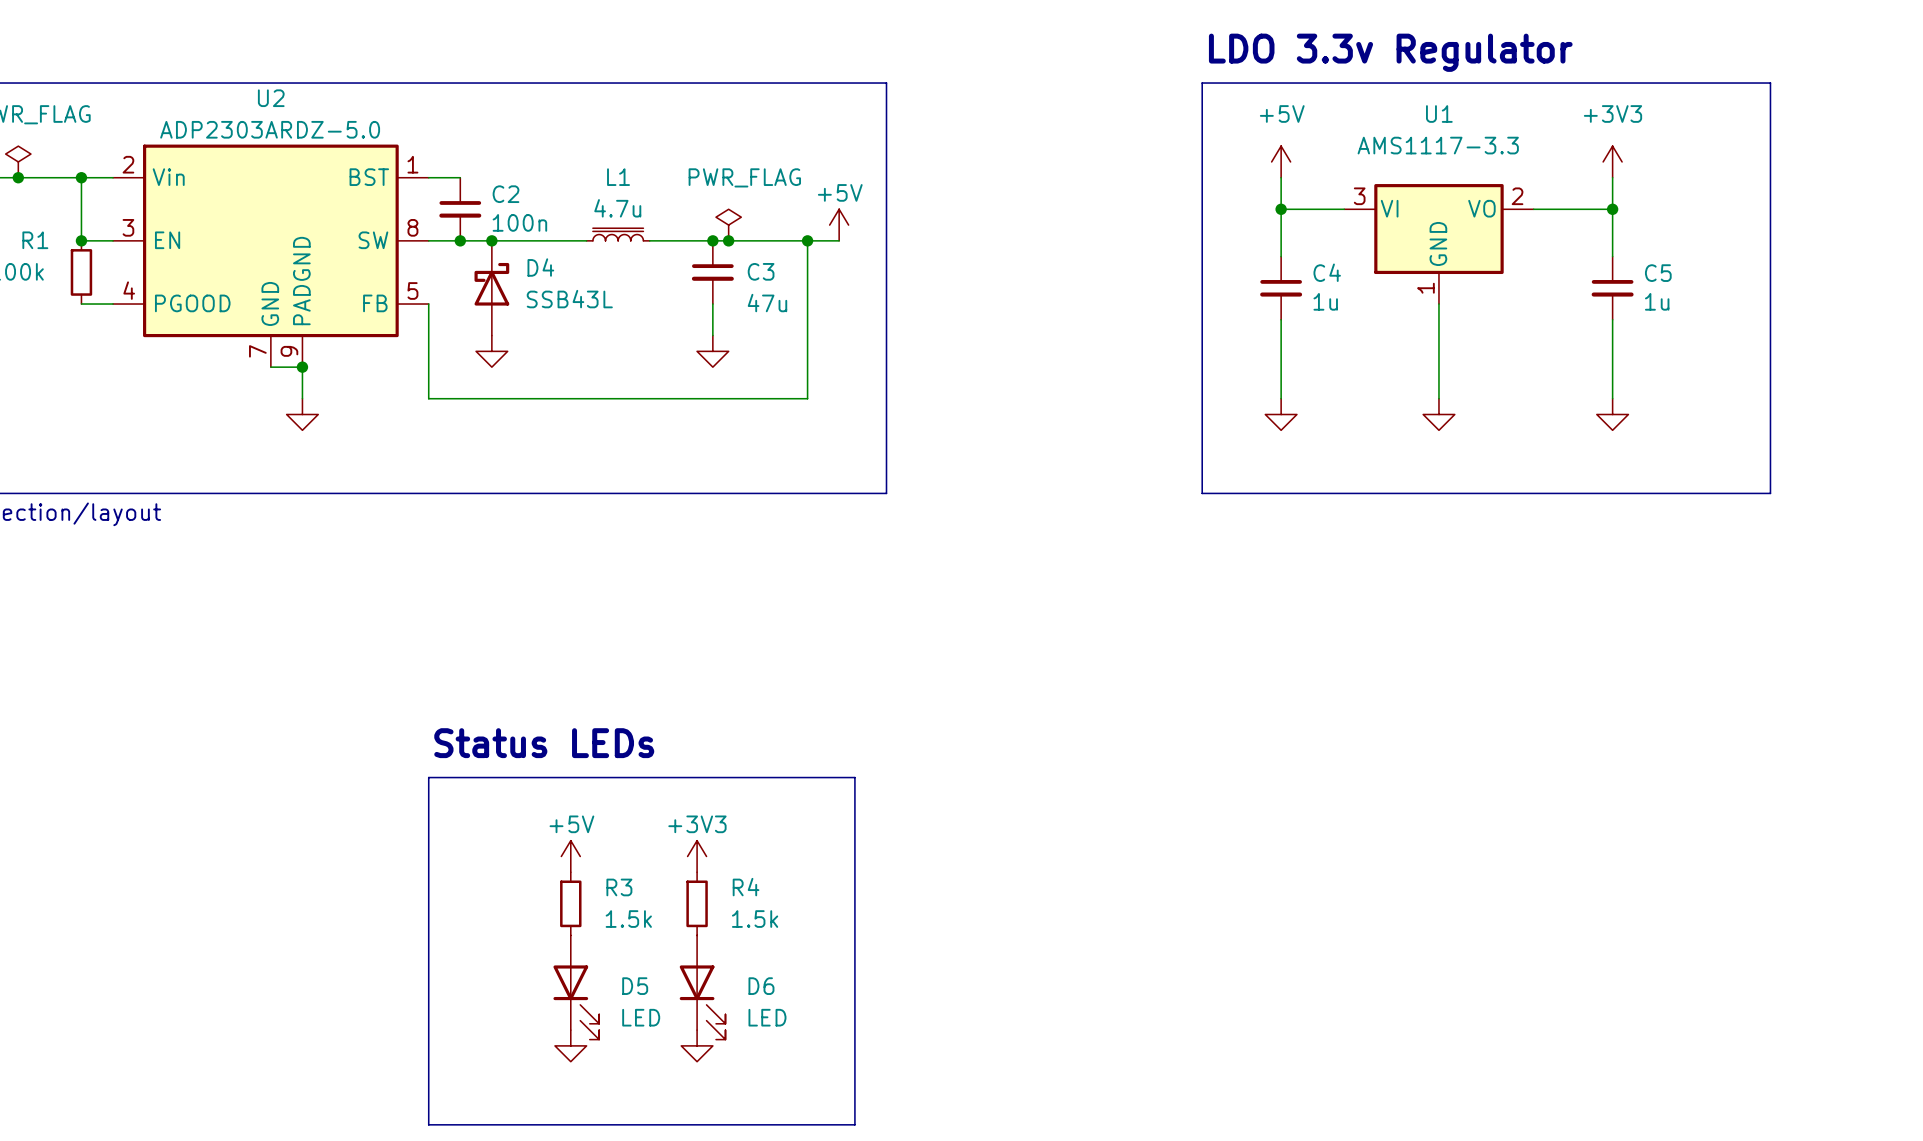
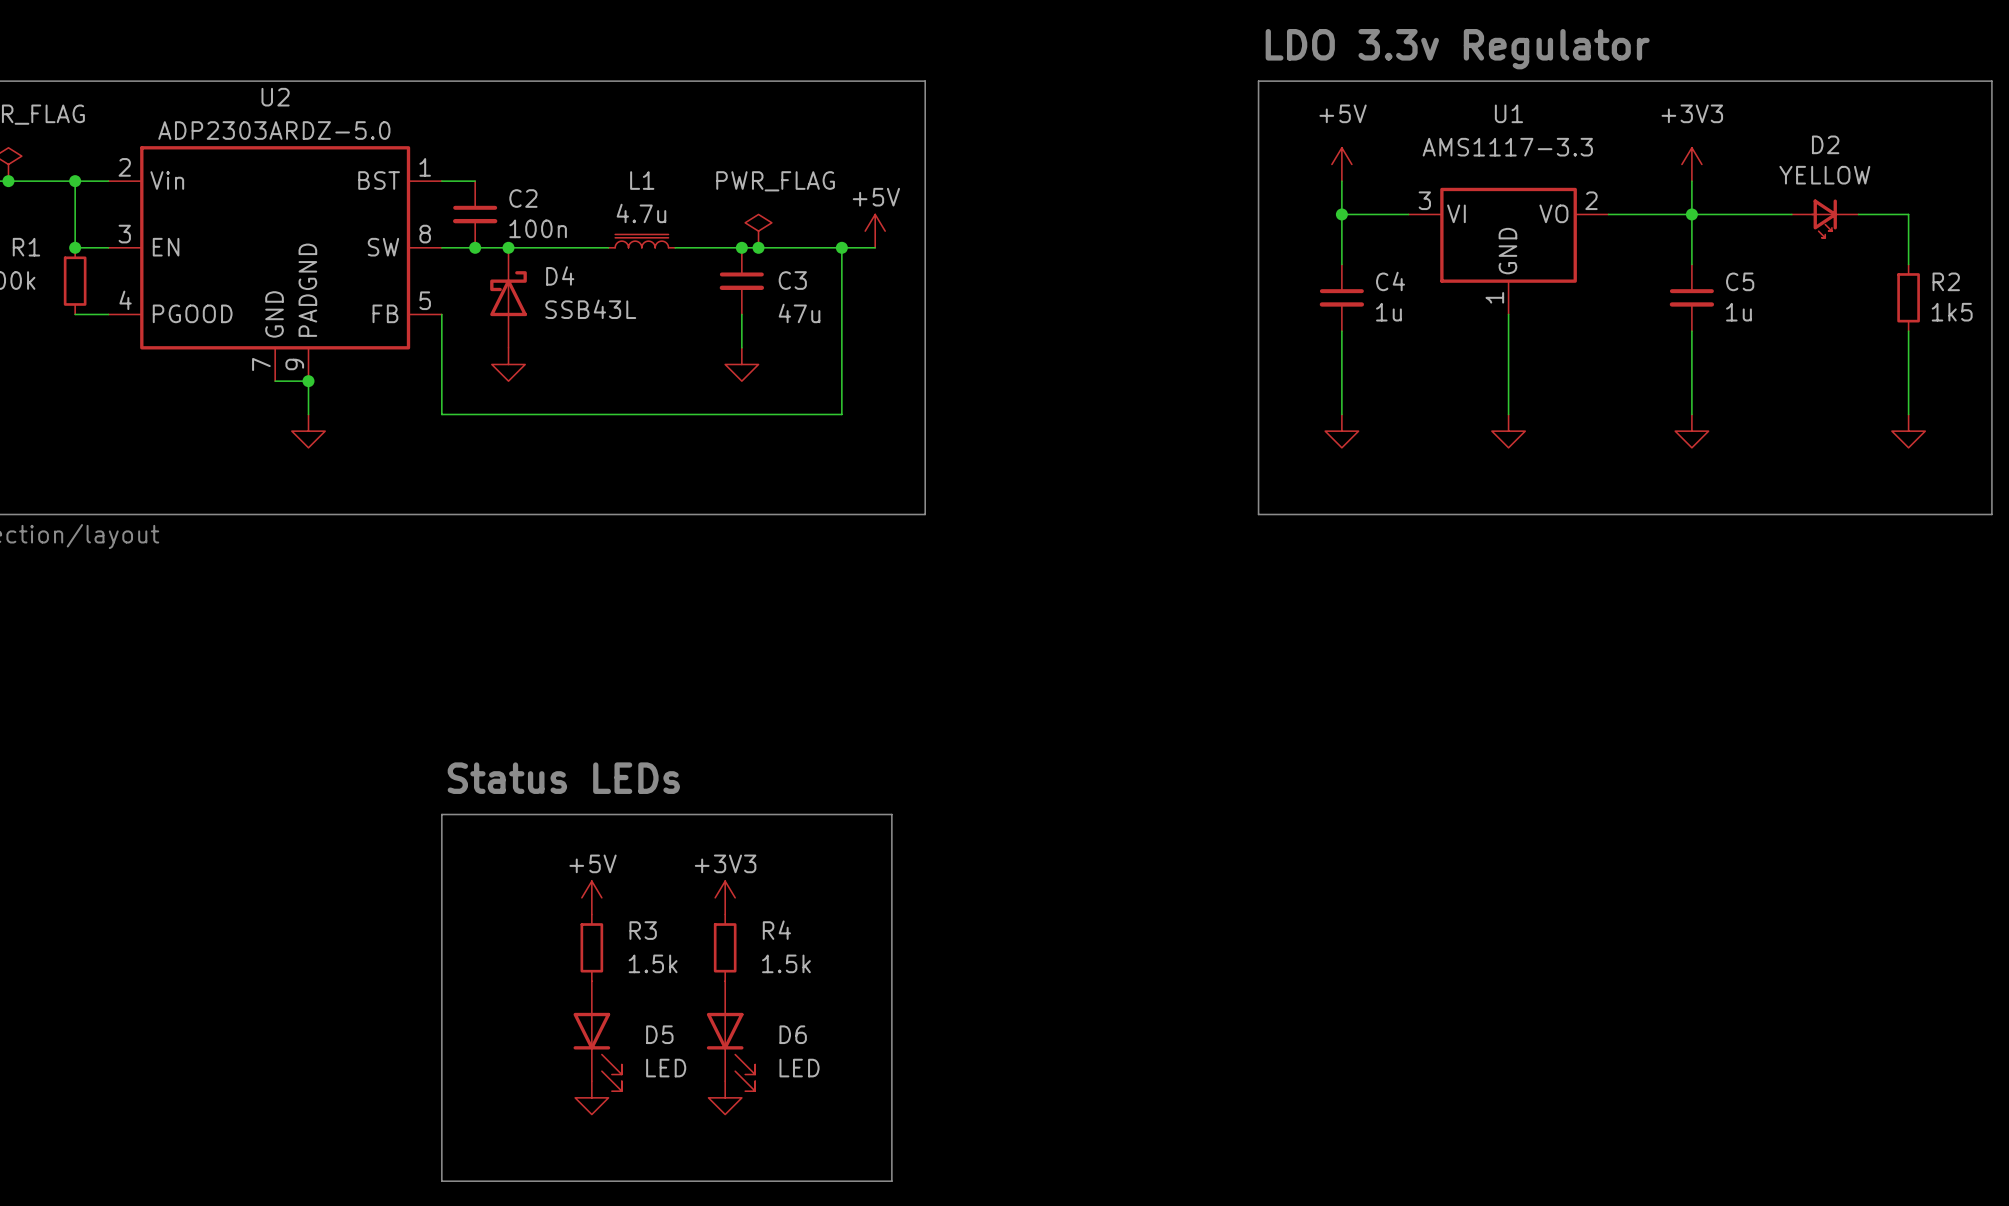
line: (1770, 83) (1770, 493) -> (1858, 81) (1991, 81) (1991, 514) (1858, 514)
wire: none -> (1691, 214) (1791, 214)
wire: none -> (1858, 214) (1908, 214) (1908, 264)
D2: none -> YELLOW (1825, 218)
R2: none -> 1k5 (1908, 297)
wire: none -> (1908, 331) (1908, 414)
power symbol: none -> (1908, 431)

